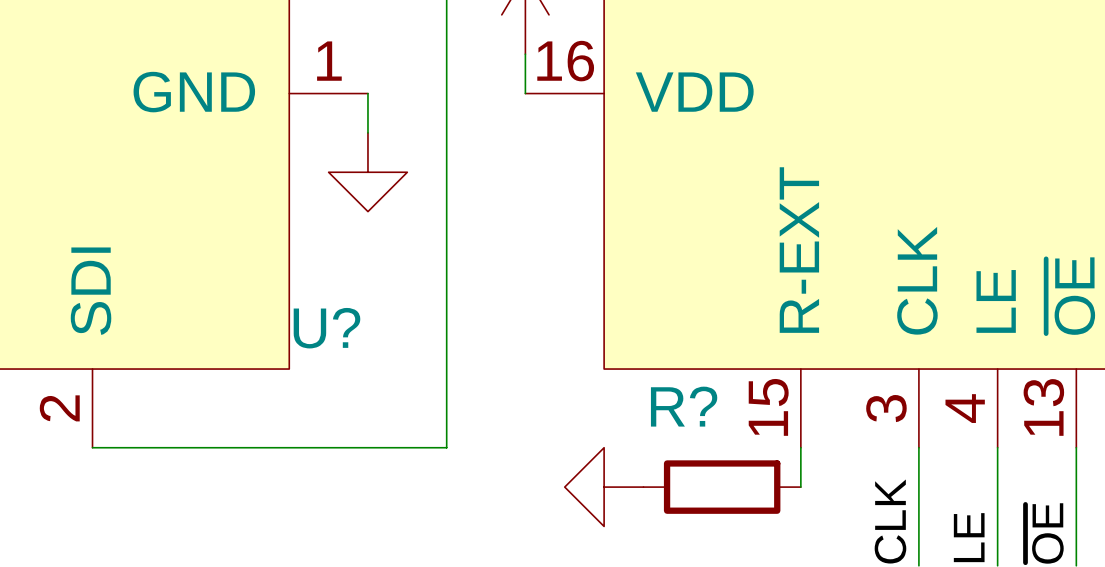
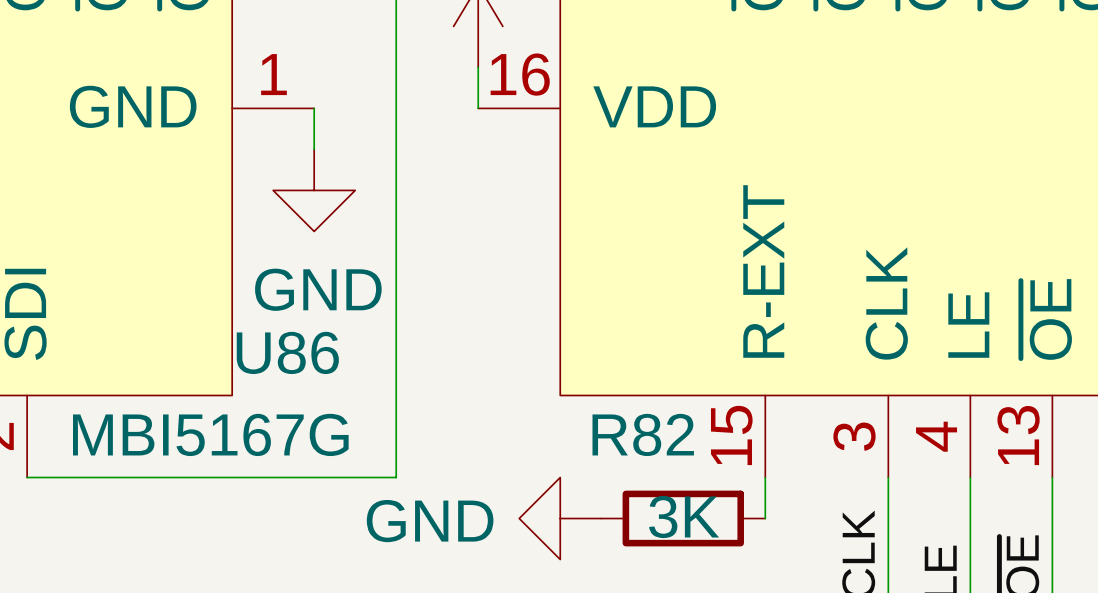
power symbol text: none -> GND (318, 289)
U? name: U? (326, 328) -> U86 (287, 352)
U? value: none -> MBI5167G (210, 434)
R? name: R? (684, 406) -> R82 (643, 434)
R? value: none -> 3K (684, 516)
power symbol text: none -> GND (430, 521)

